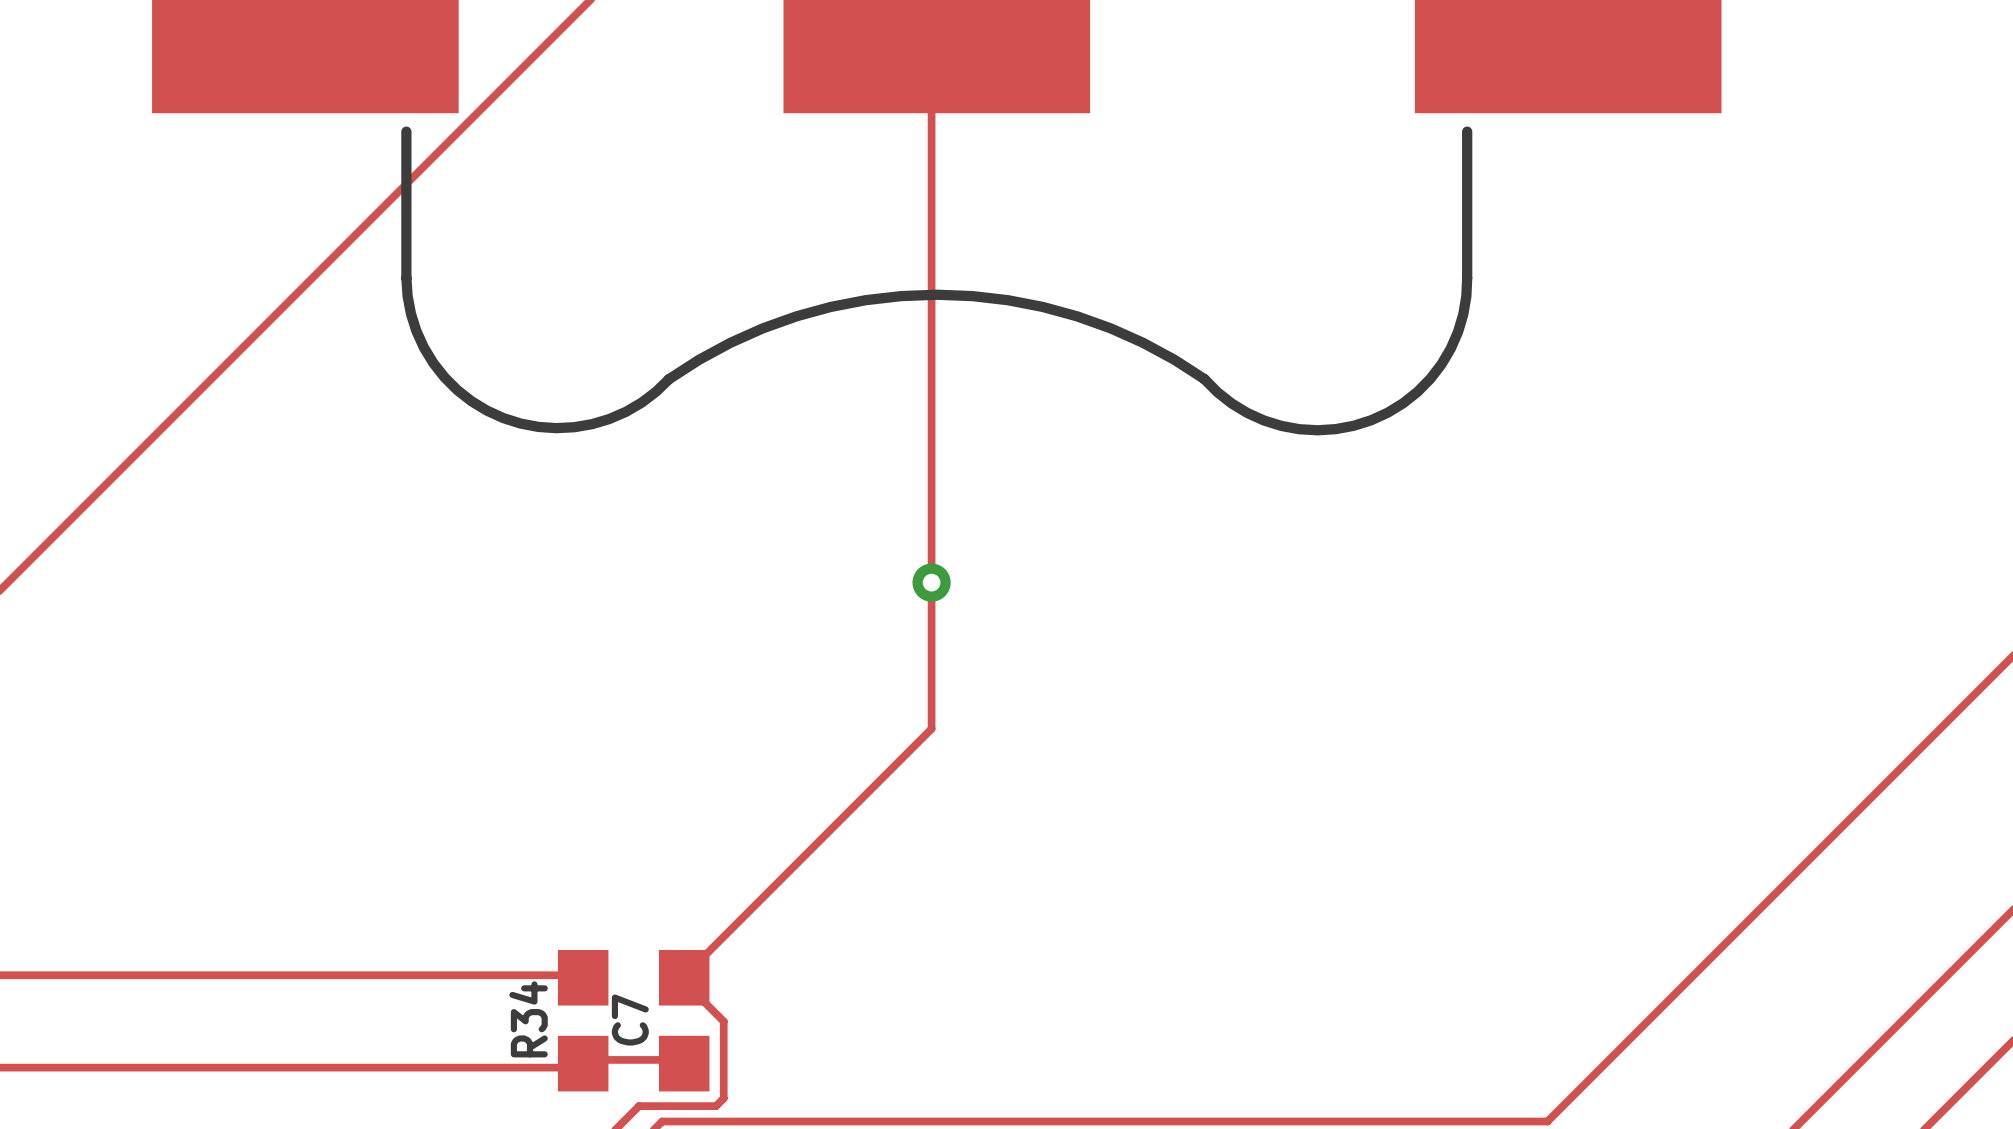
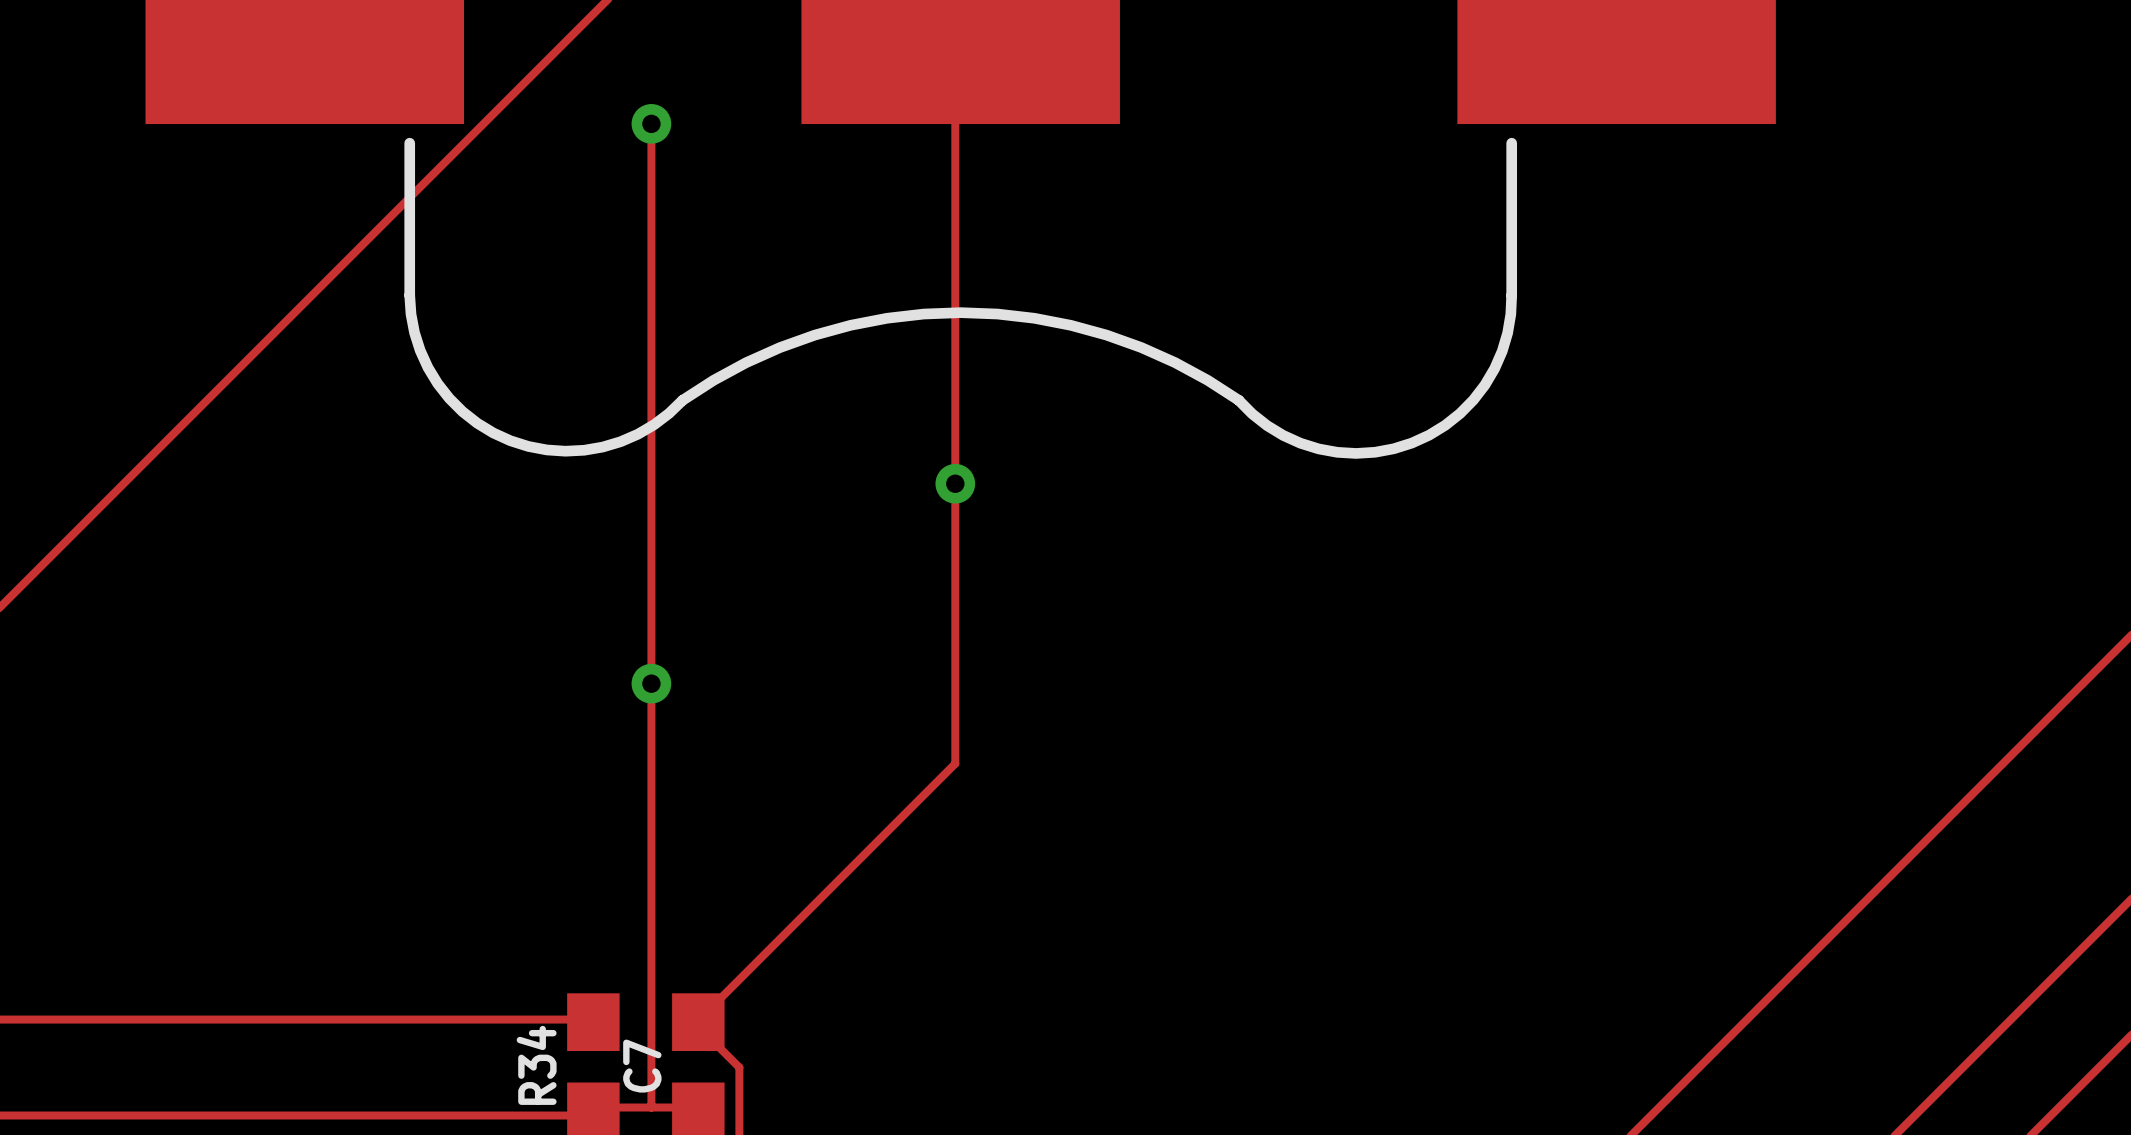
track: none -> (651, 123) (651, 1107)
via: none -> (651, 123)
via position: (931, 582) -> (955, 483)
via: none -> (651, 683)

